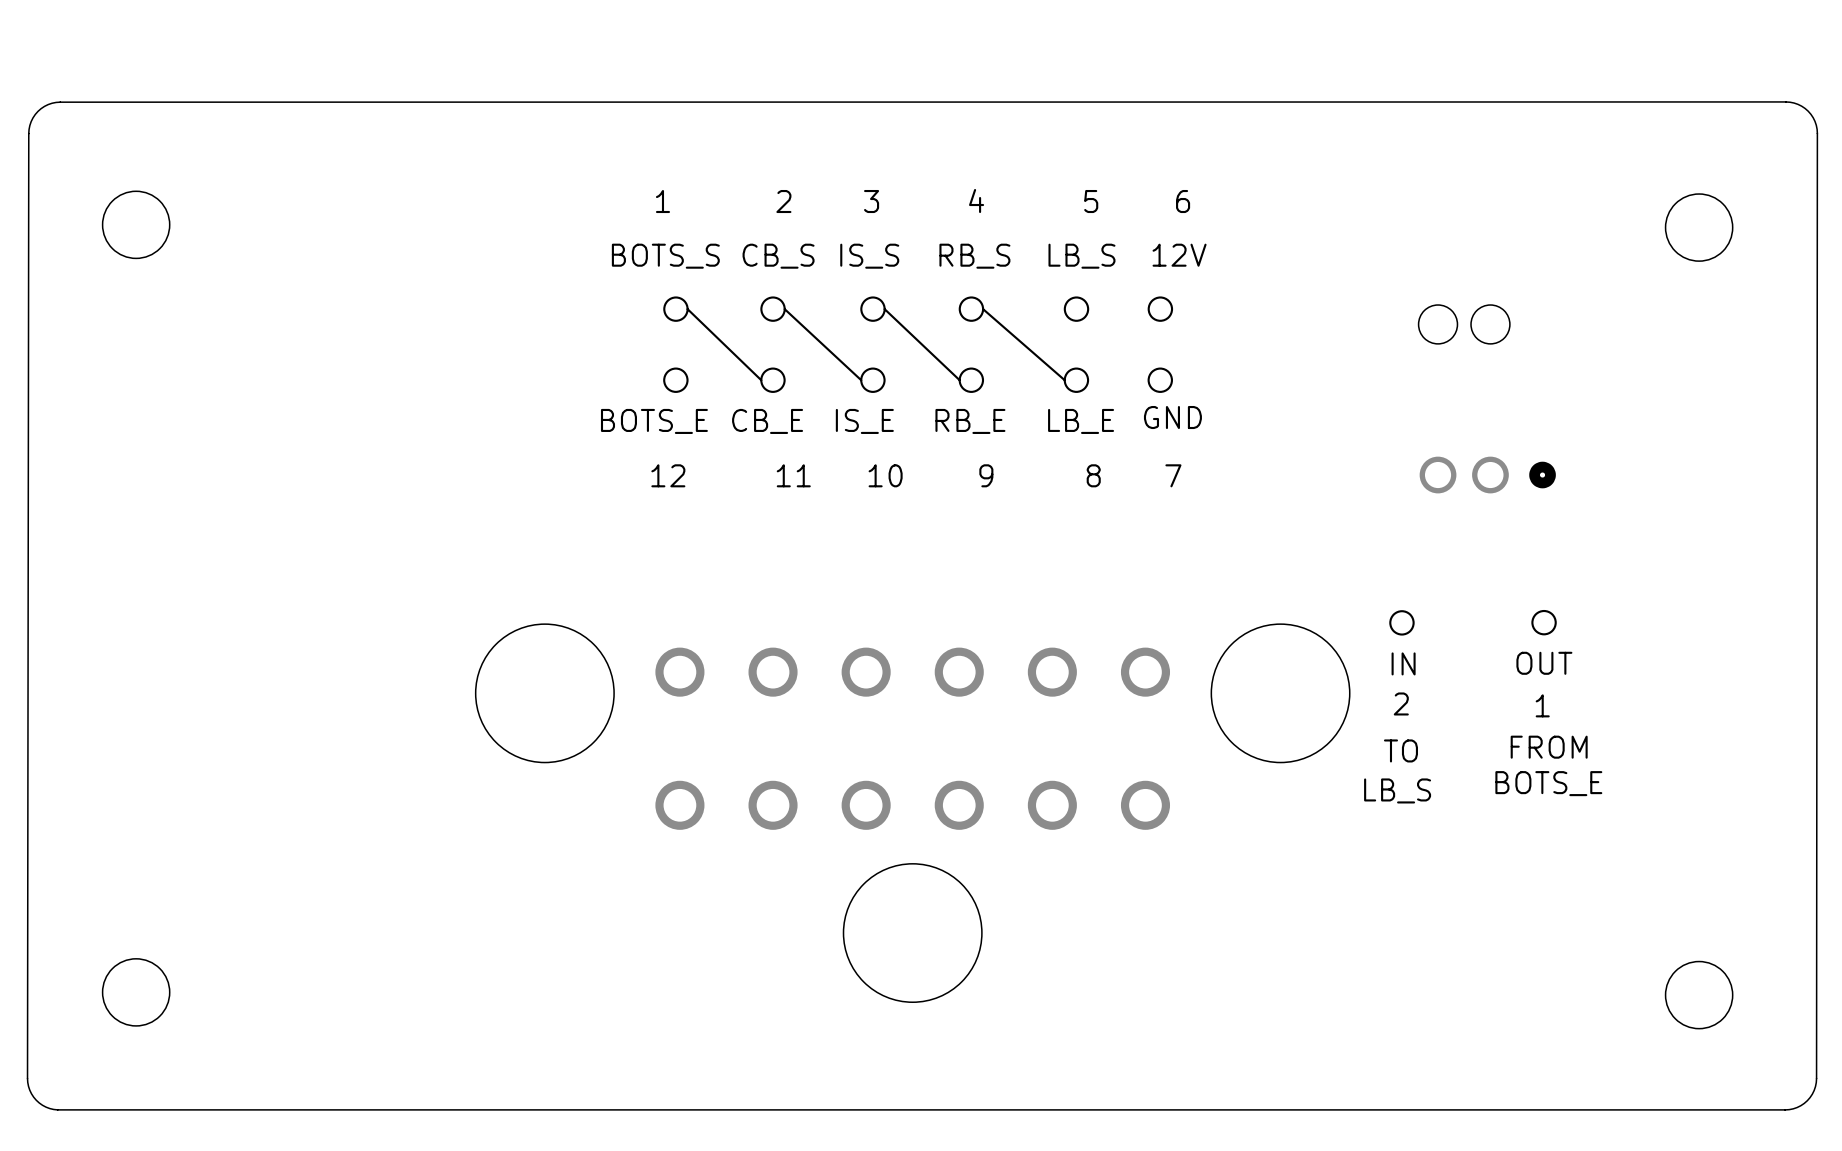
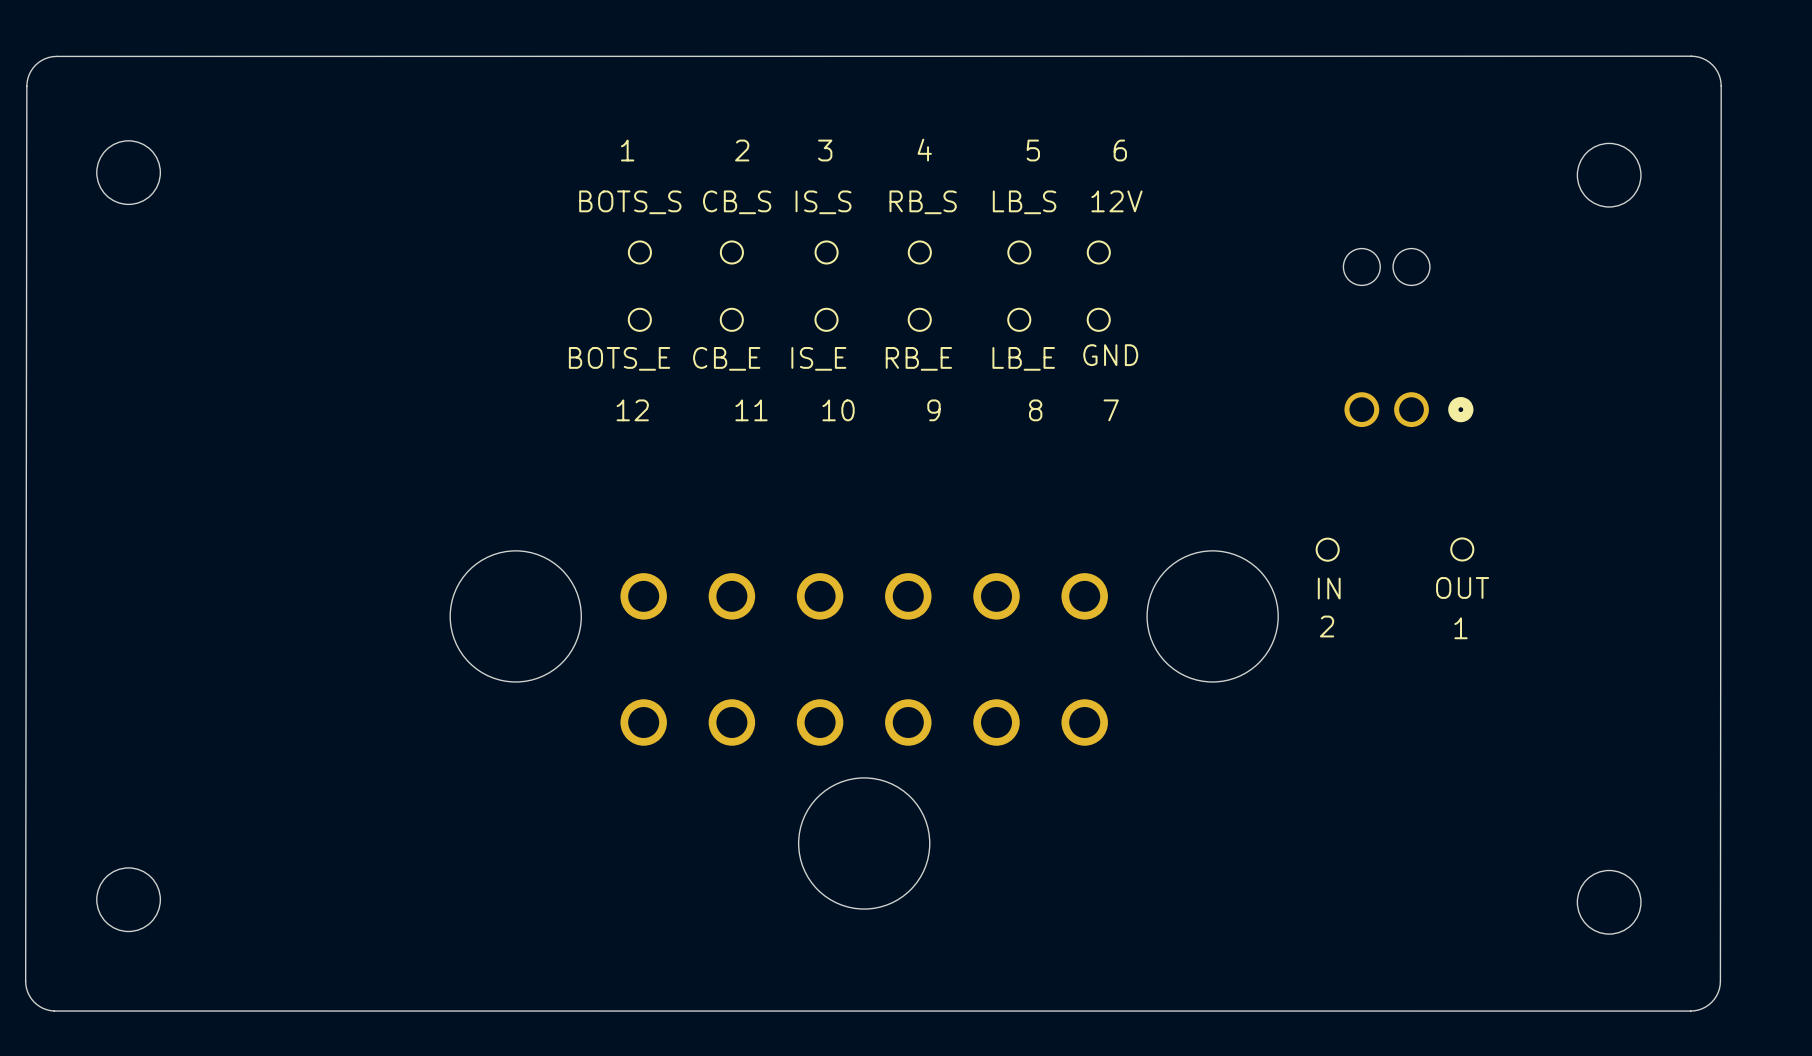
line: (687, 309) (761, 380) -> none
line: (784, 309) (861, 380) -> none
line: (884, 309) (959, 380) -> none
line: (983, 309) (1064, 380) -> none
text: FROM (1549, 747) -> none
text: TO (1400, 750) -> none
text: BOTS_E (1548, 783) -> none
text: LB_S (1397, 790) -> none

